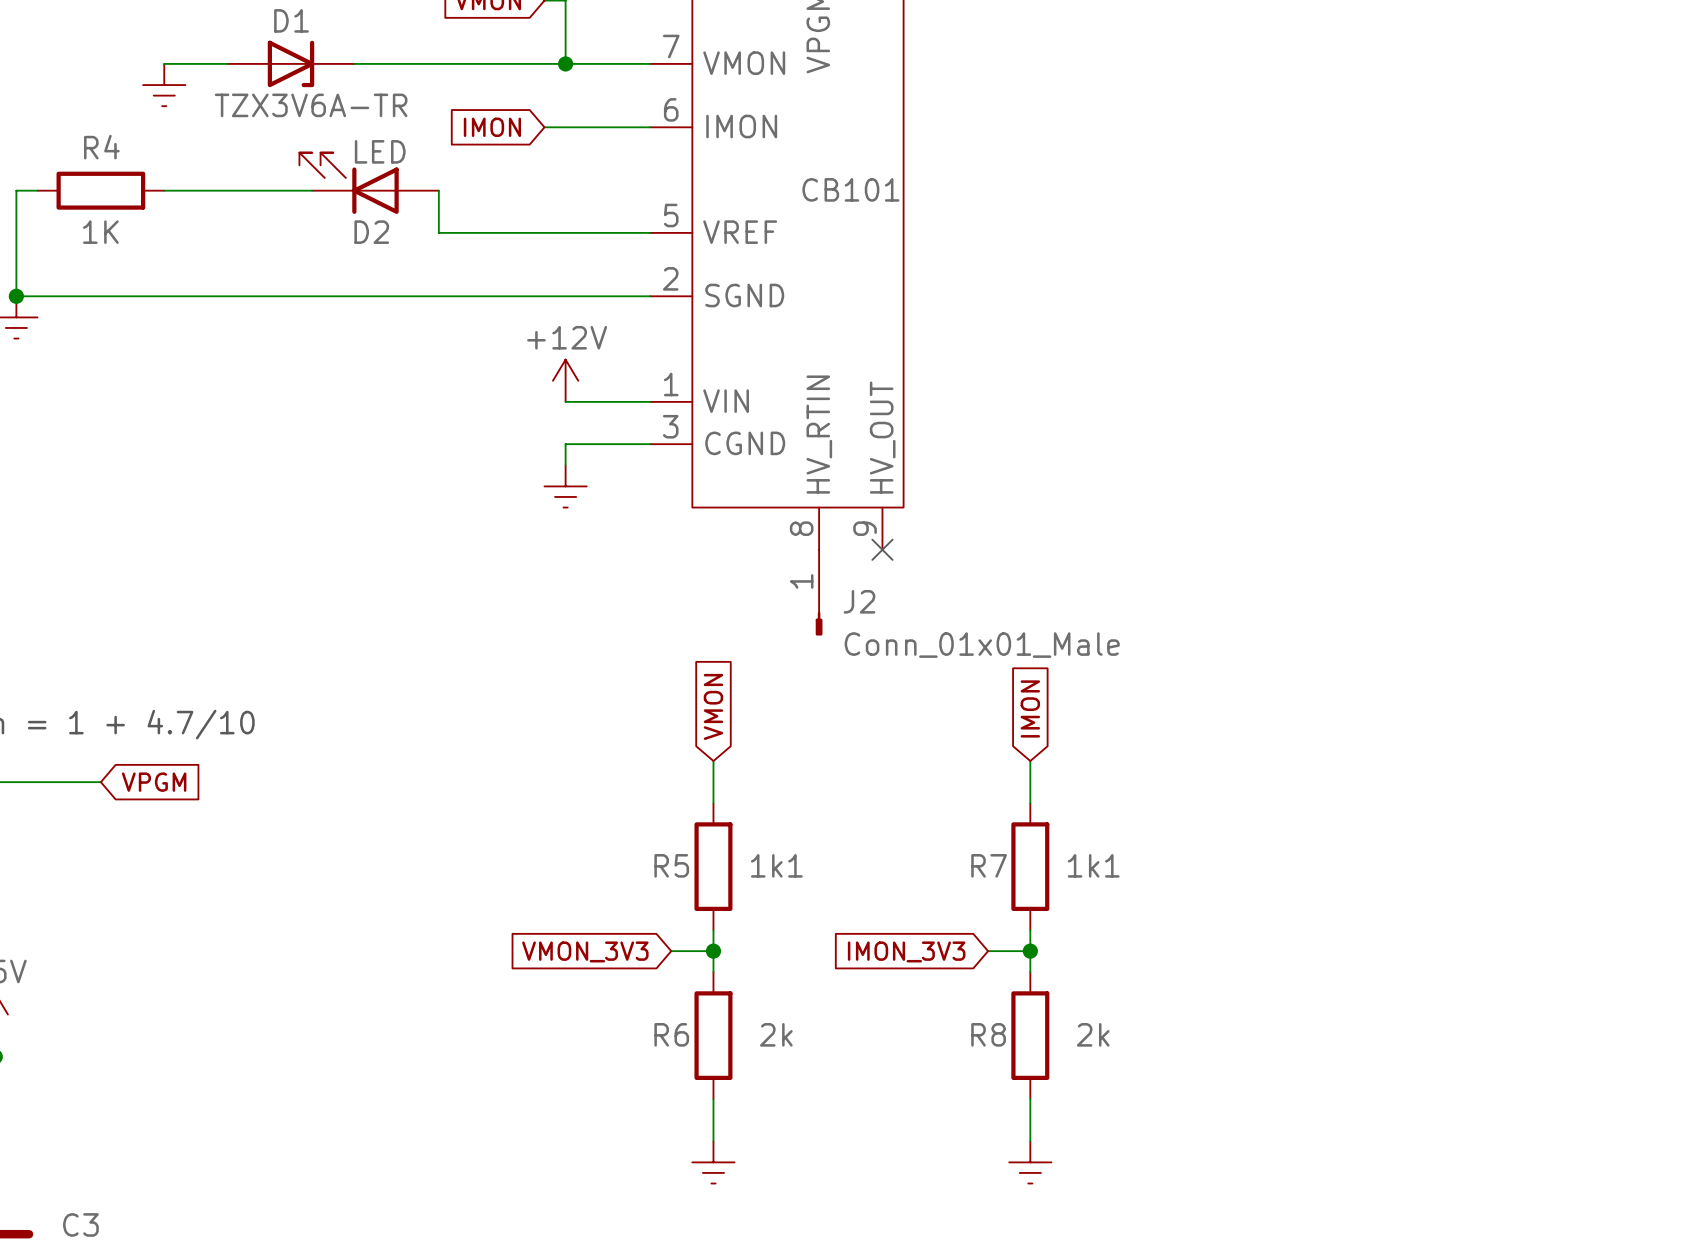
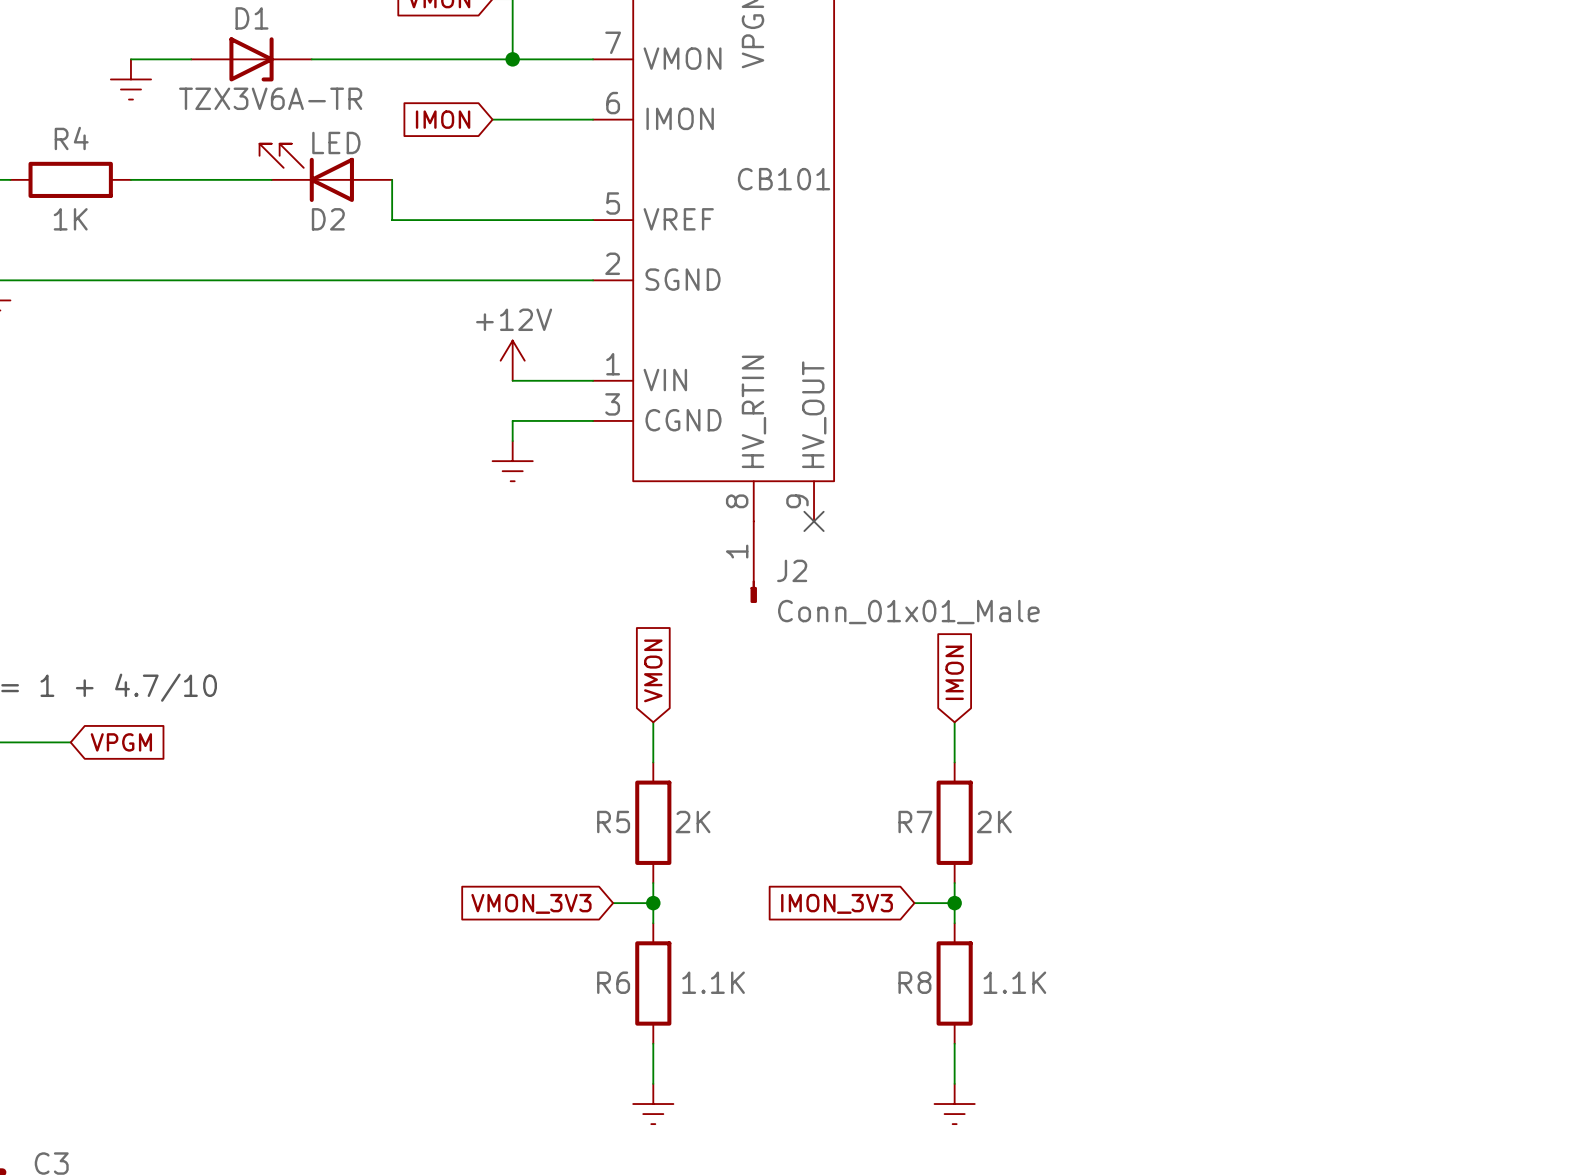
R5 value: 1k1 (776, 865) -> 2K (693, 822)
R7 value: 1k1 (1093, 865) -> 2K (994, 822)
R6 value: 2k (776, 1034) -> 1.1K (713, 982)
R8 value: 2k (1093, 1034) -> 1.1K (1014, 982)

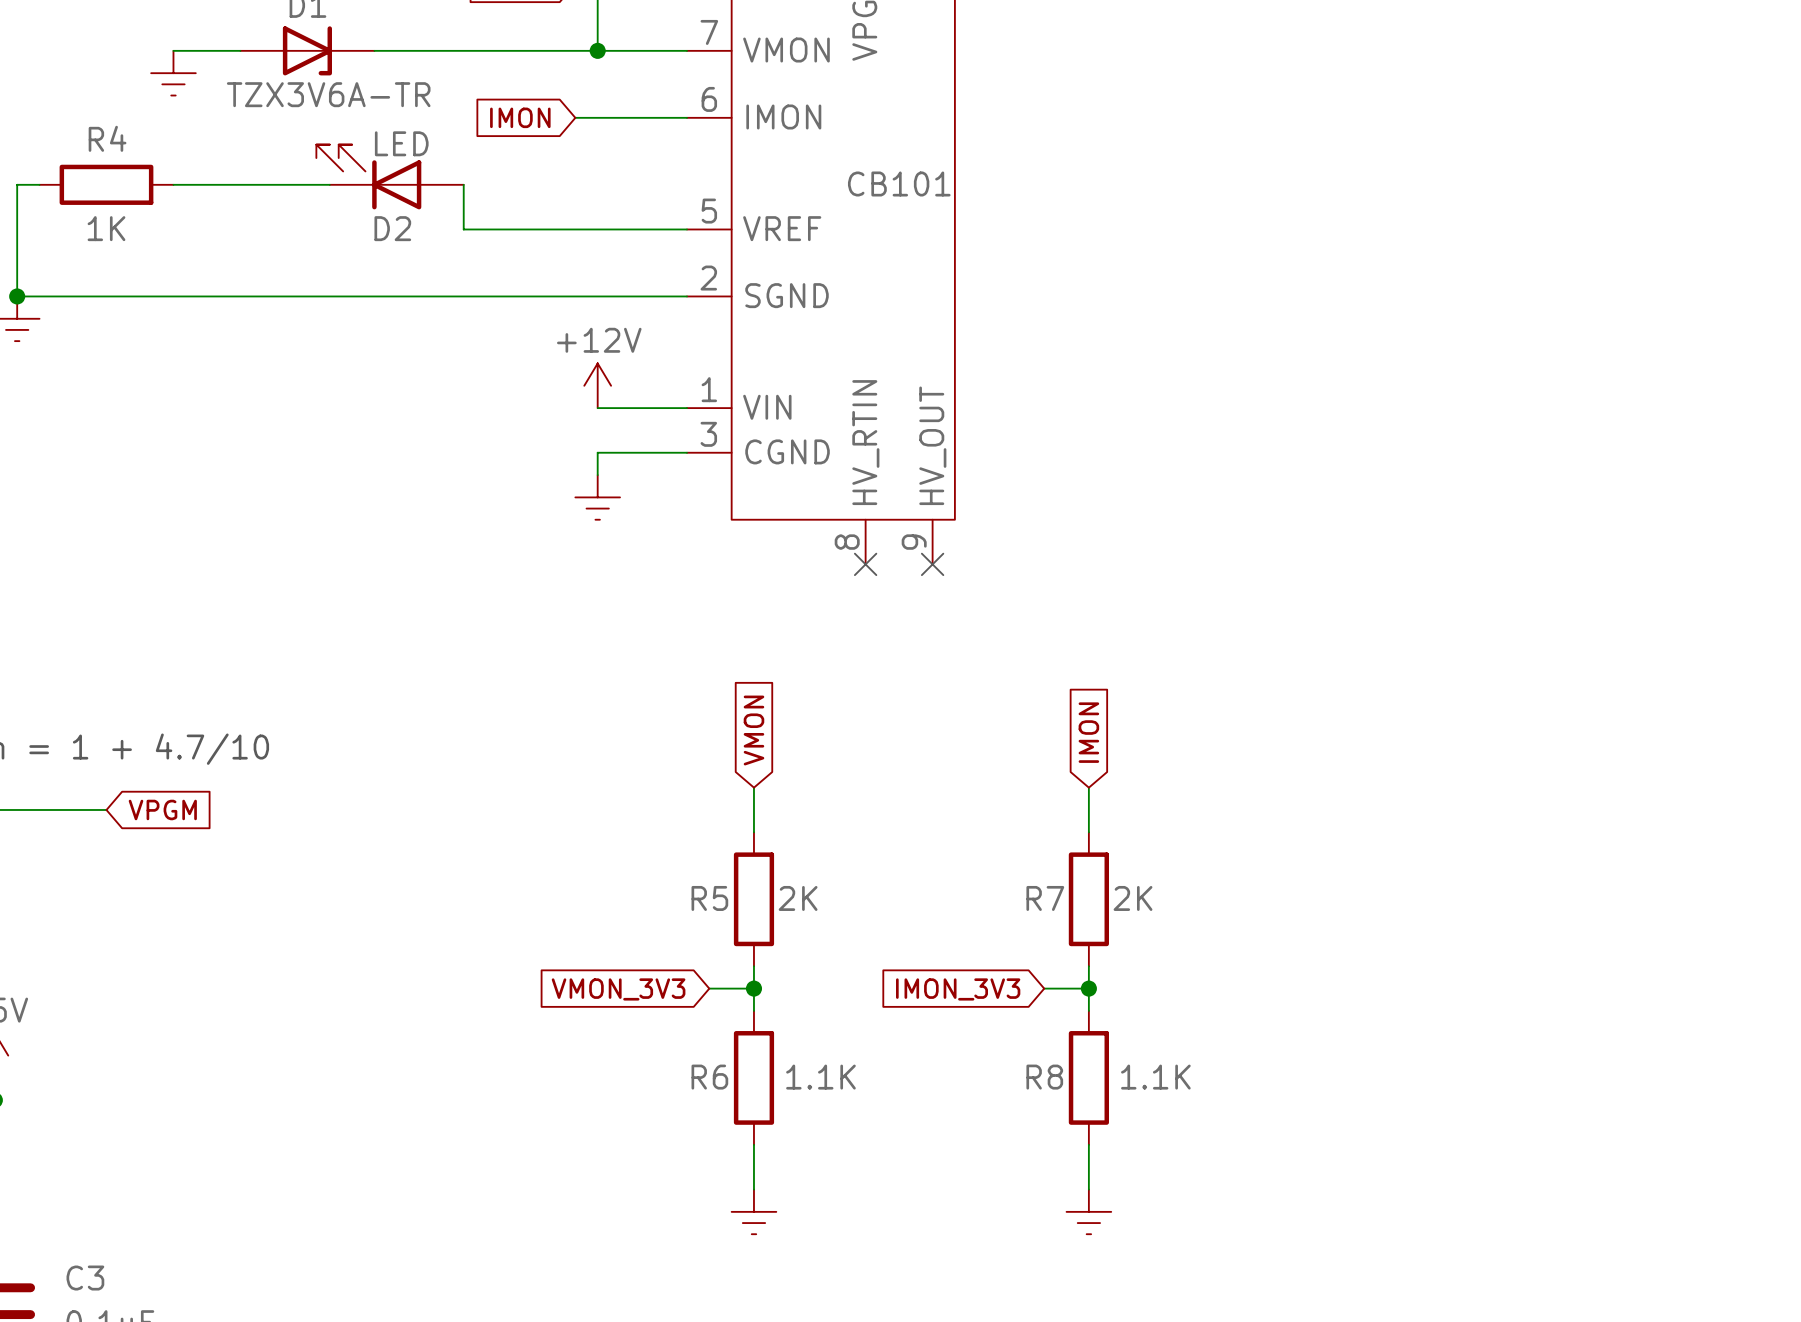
no-connect mark: none -> (865, 564)
J2: Conn_01x01_Male (753, 562) -> none

